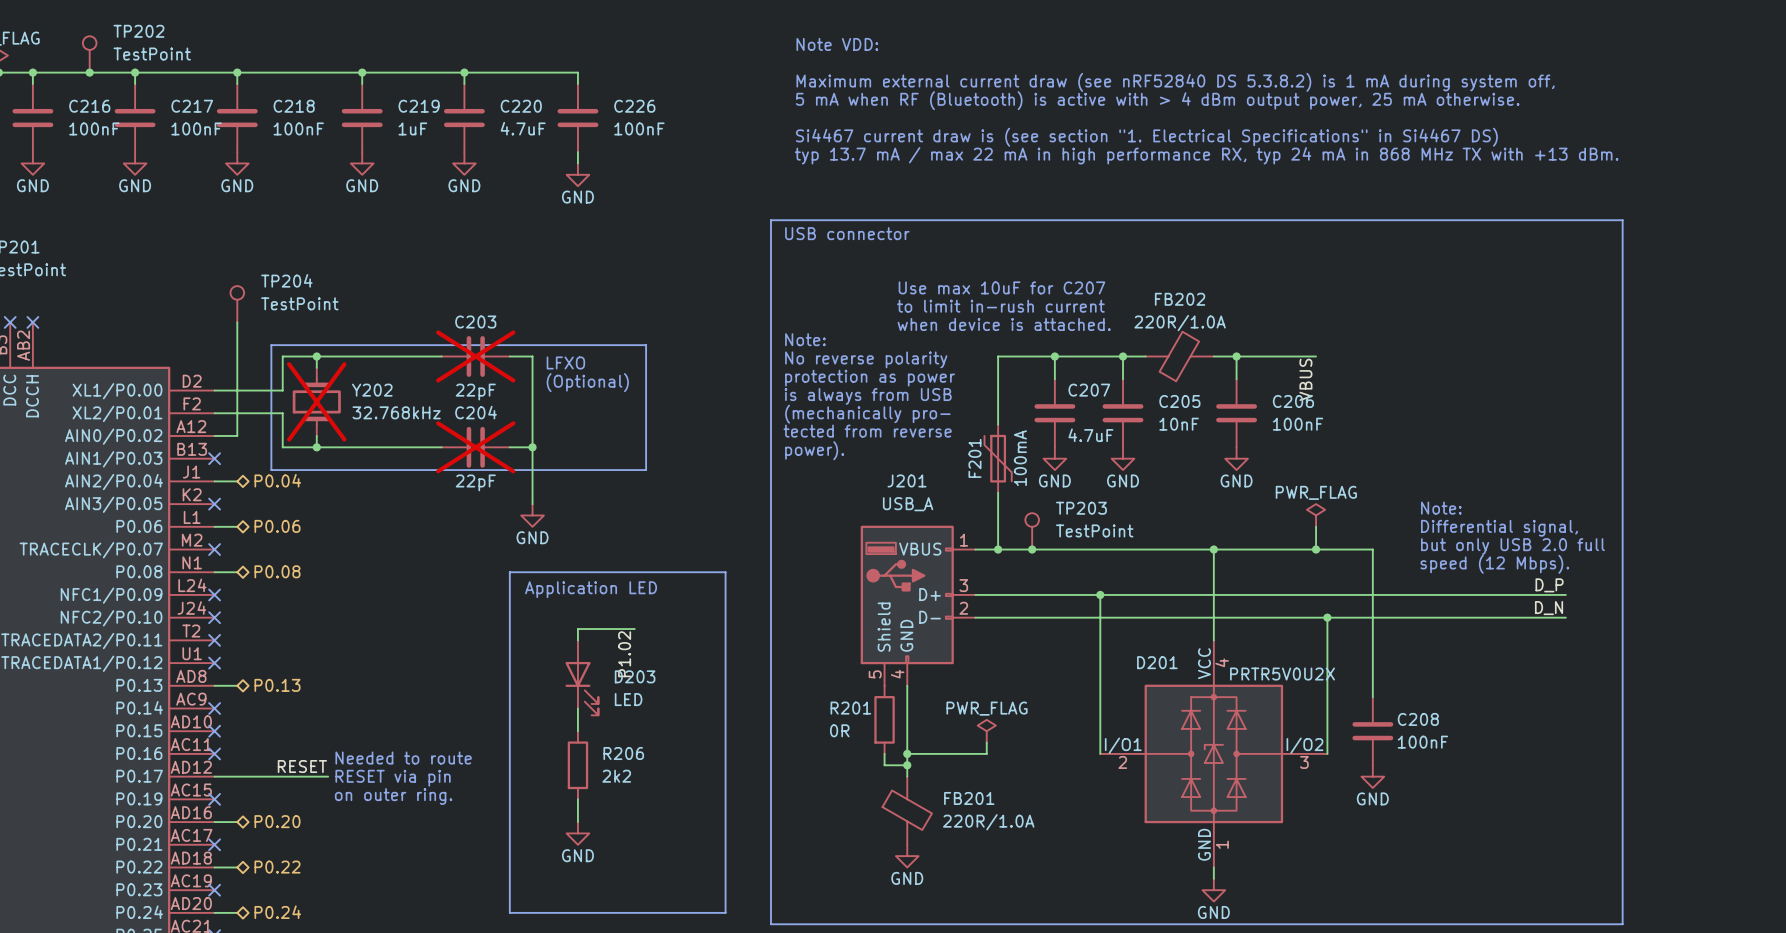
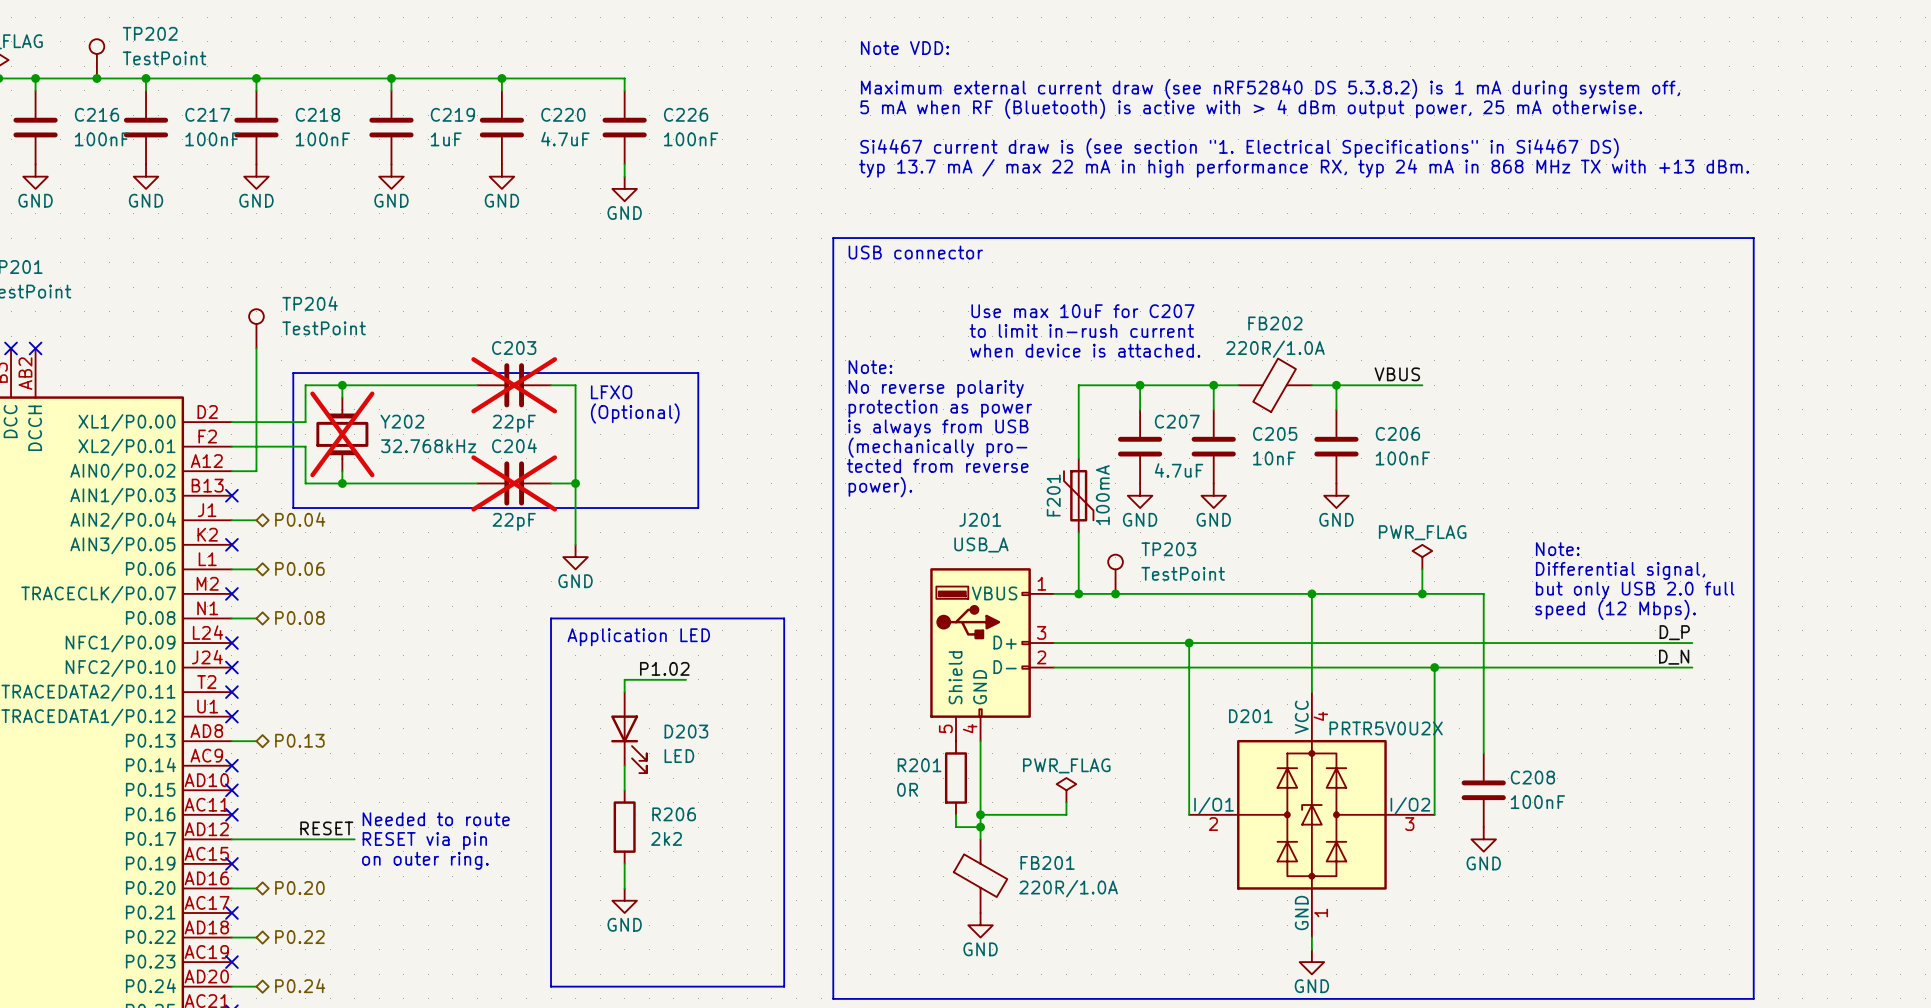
label rotation: 0° (1305, 379) -> 90° clockwise (1397, 374)
label rotation: 0° (624, 654) -> 90° clockwise (664, 668)

